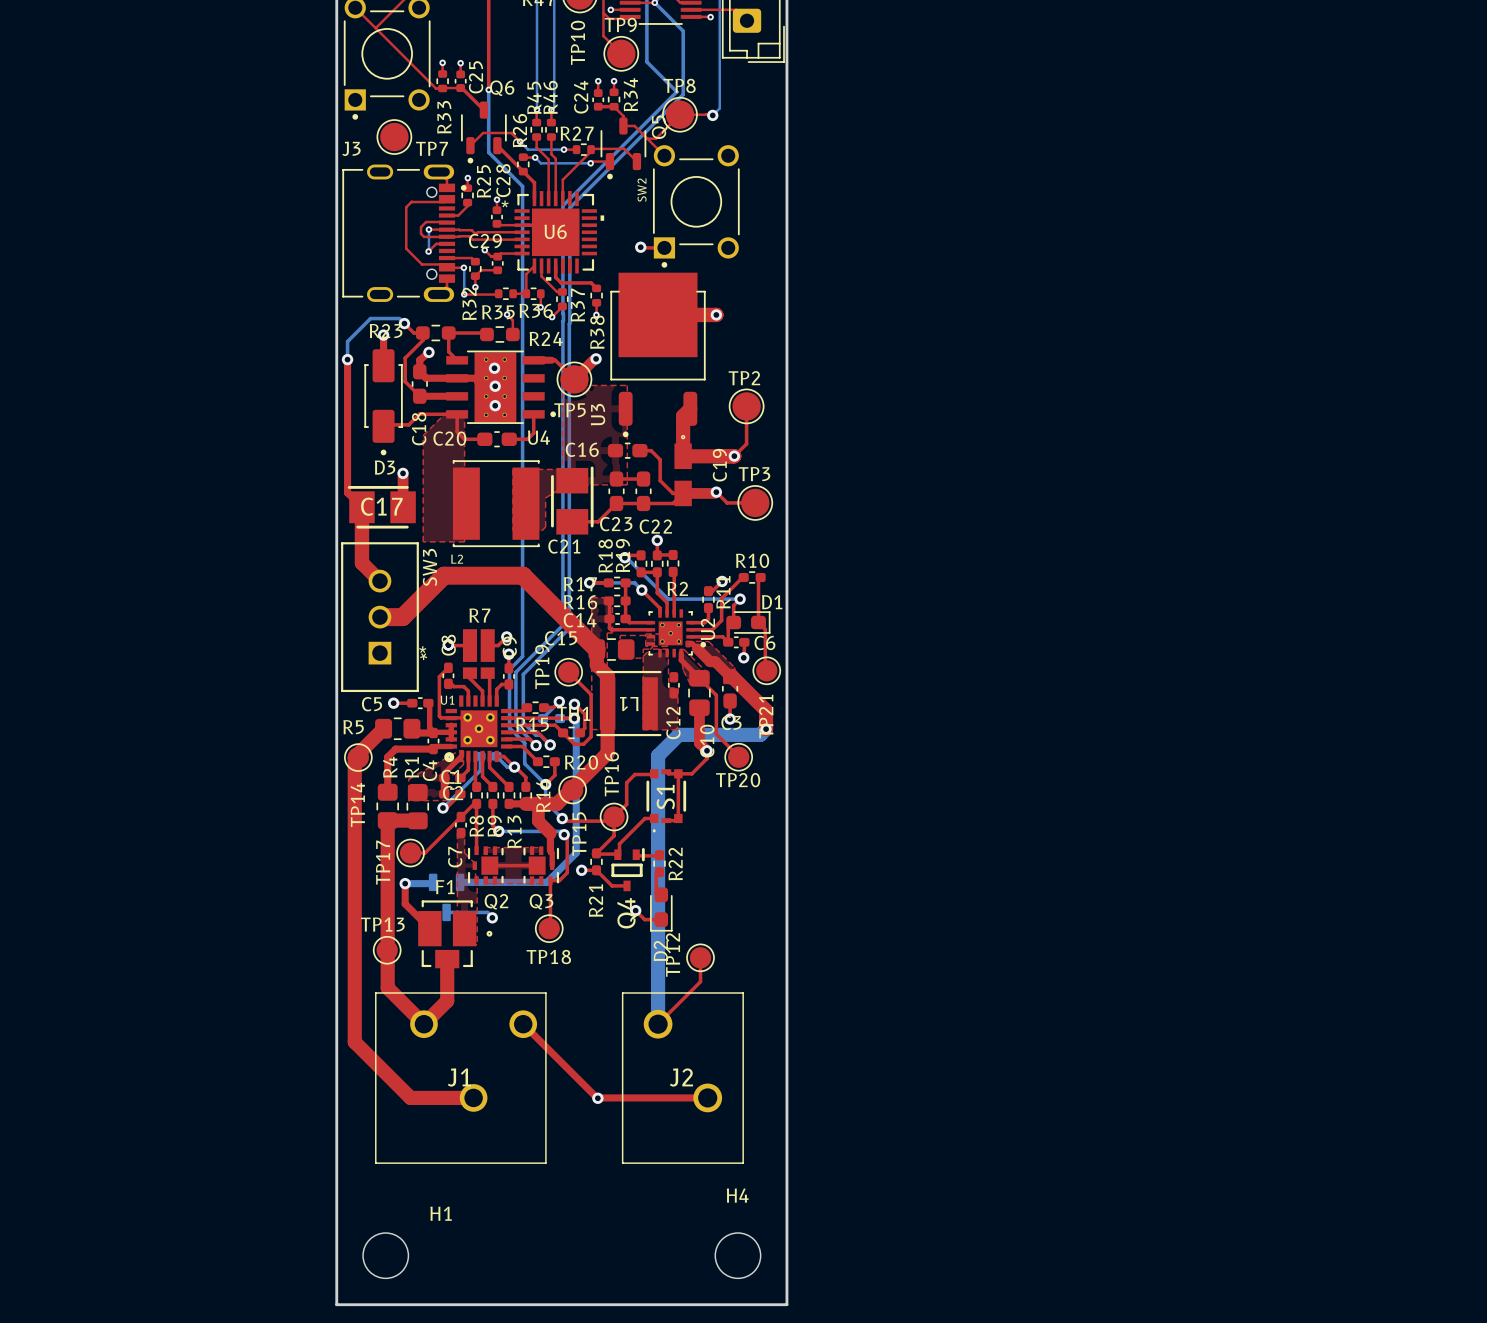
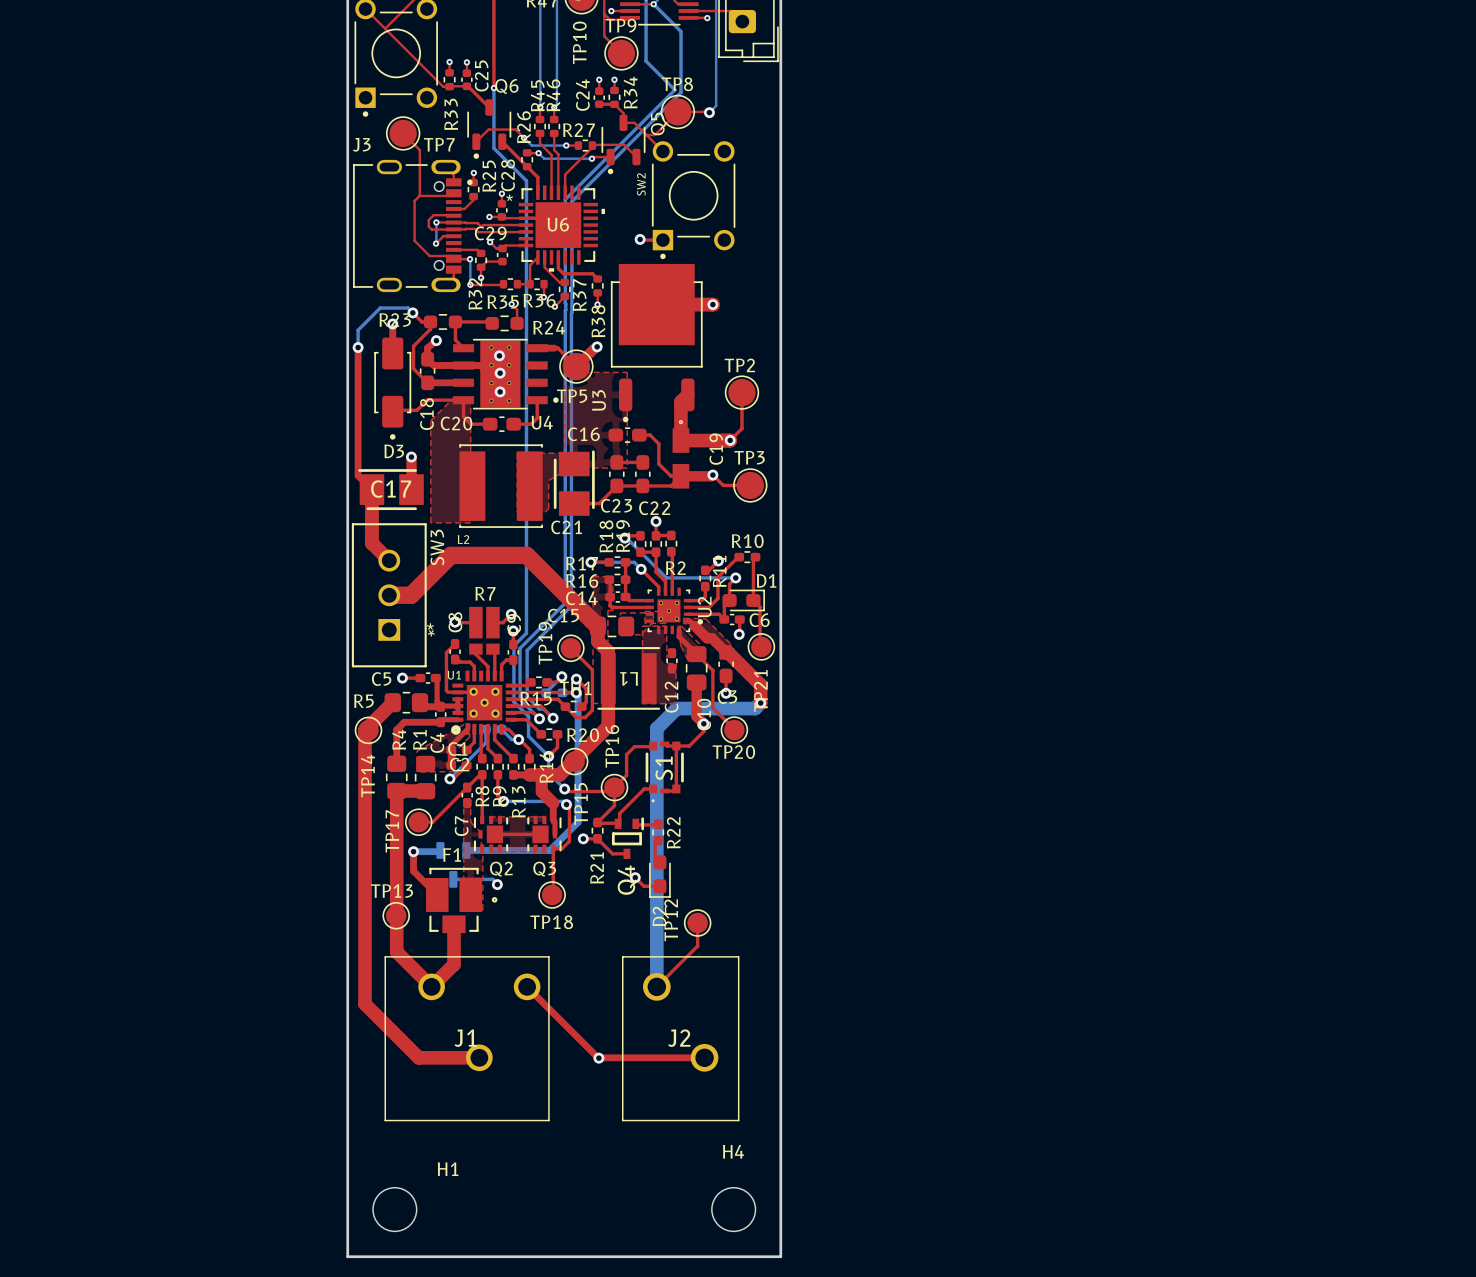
top track: none -> (403, 133) (419, 150) (419, 195)
top track: none -> (489, 216) (501, 216)
via: none -> (489, 216)

